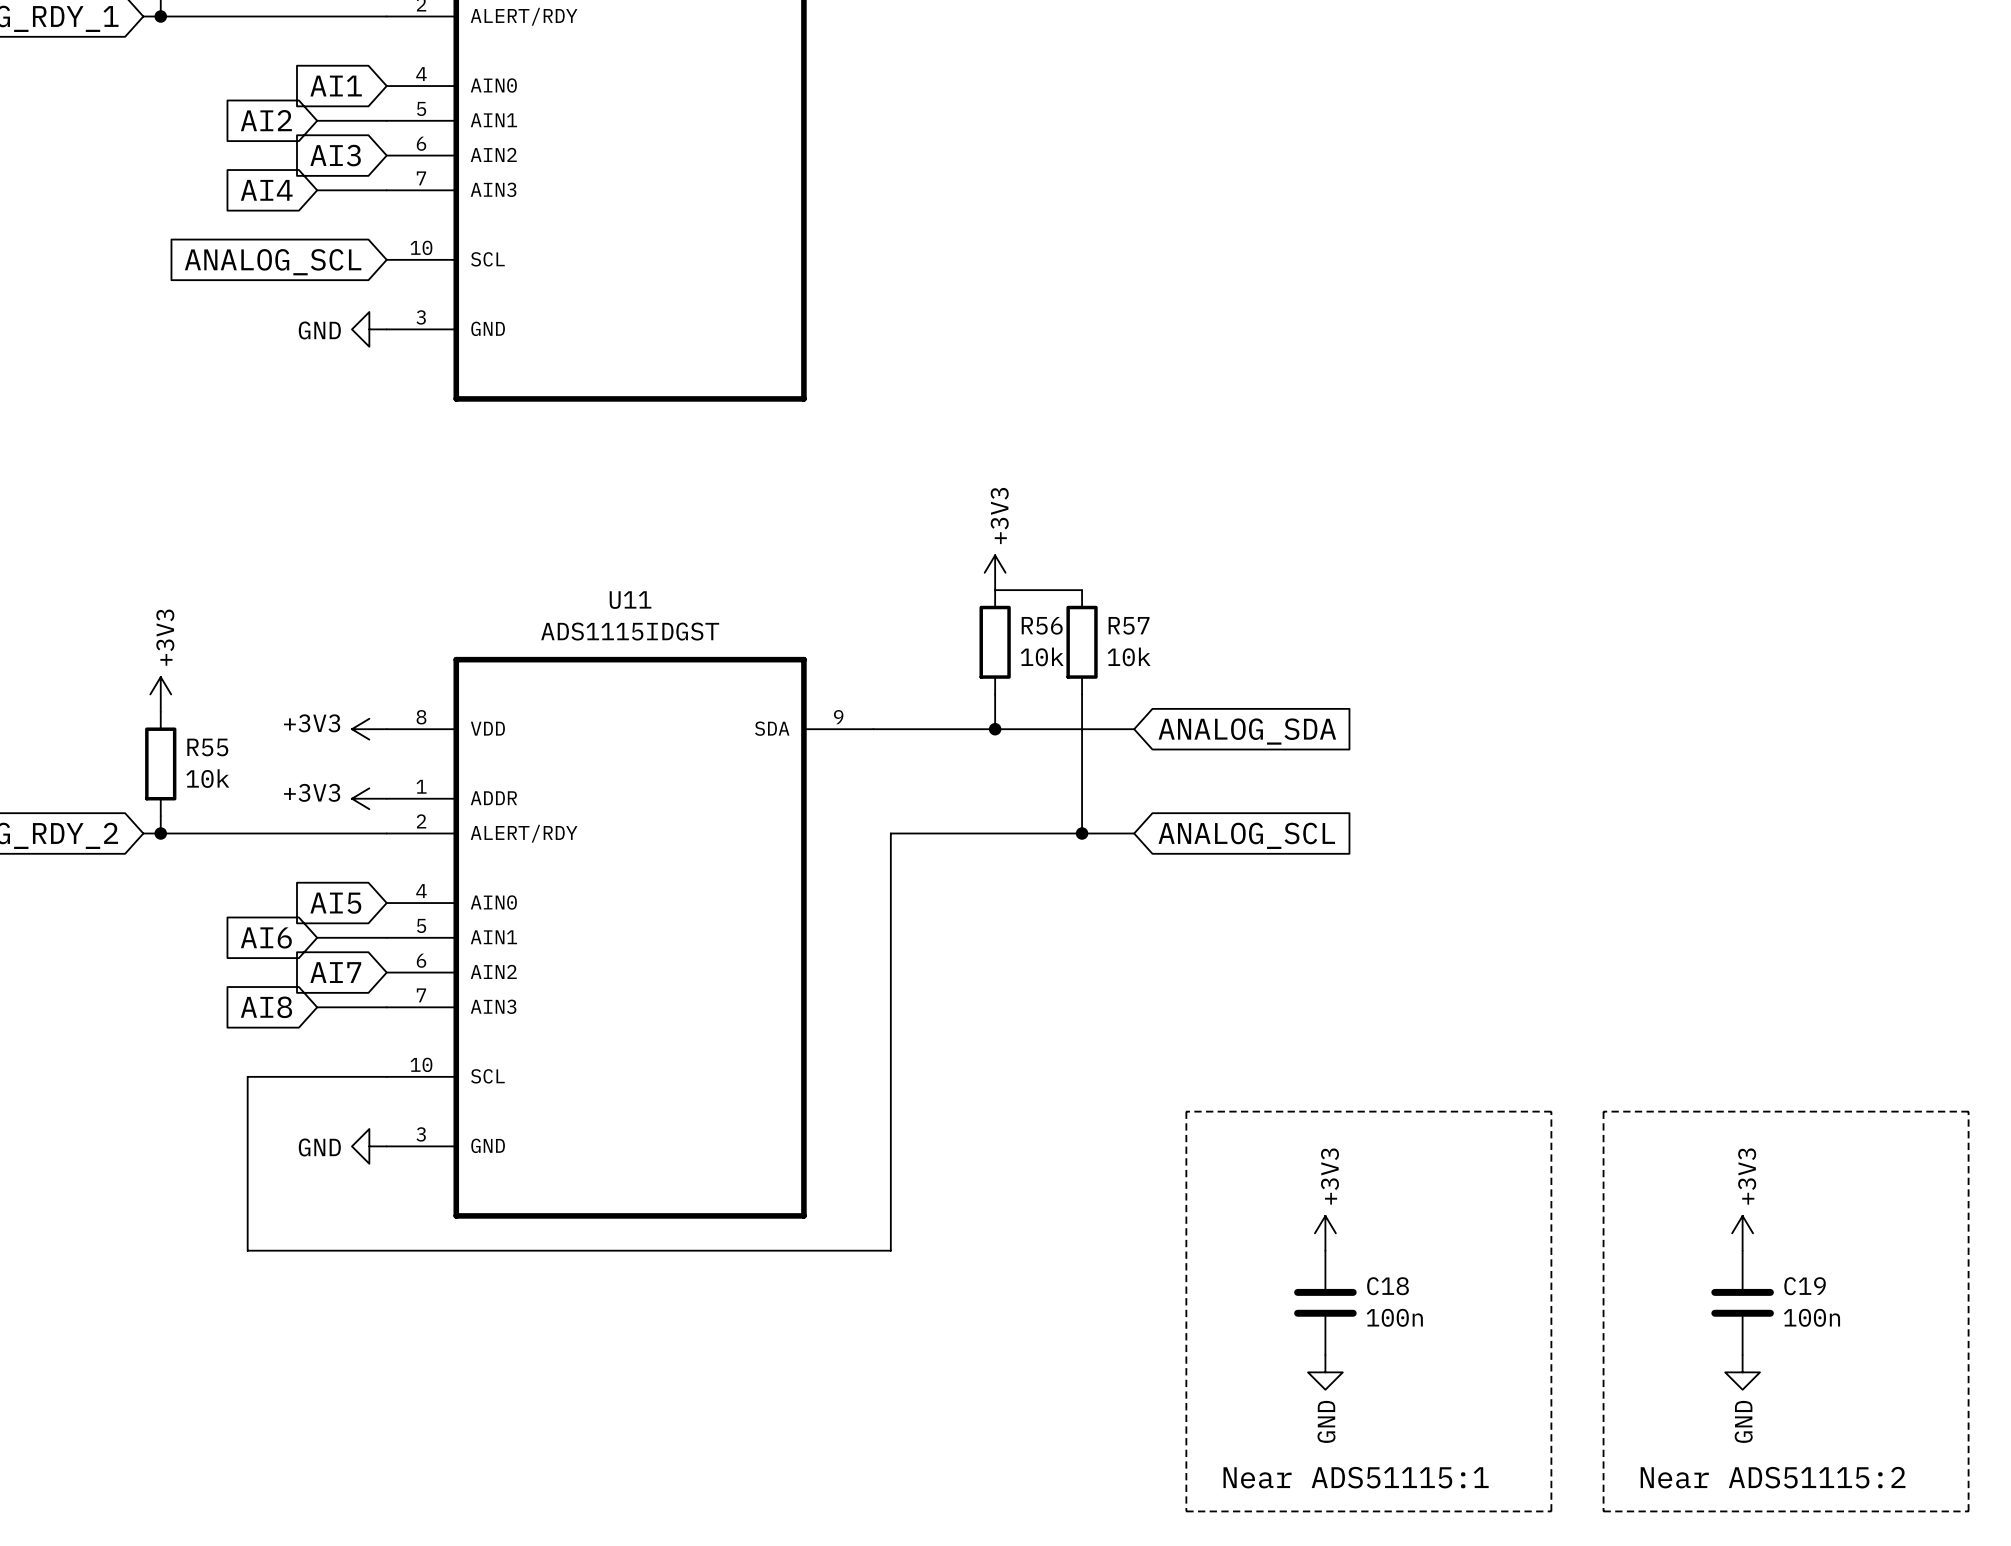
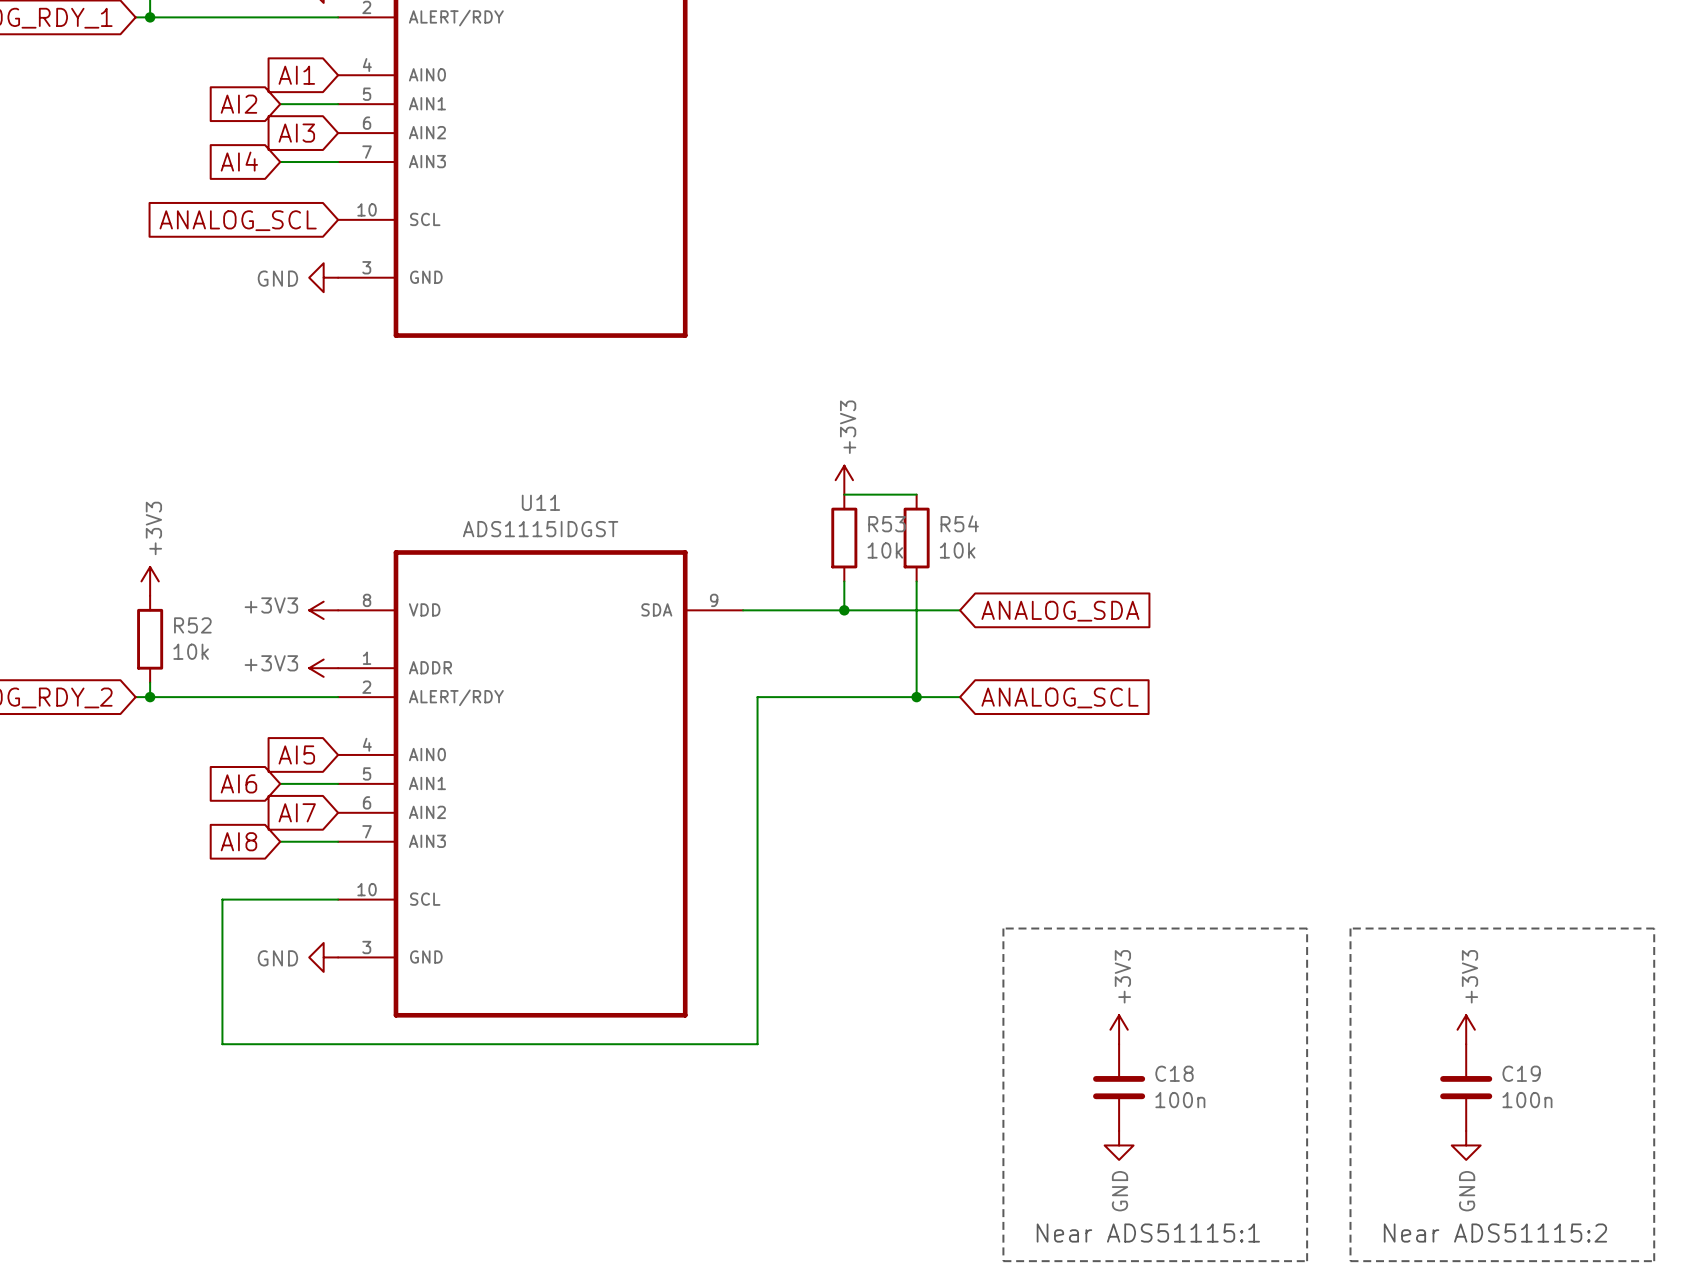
R56 name: R56 (1042, 625) -> R53 (887, 524)
R57 name: R57 (1129, 625) -> R54 (959, 523)
R55 name: R55 (207, 747) -> R52 (192, 625)

